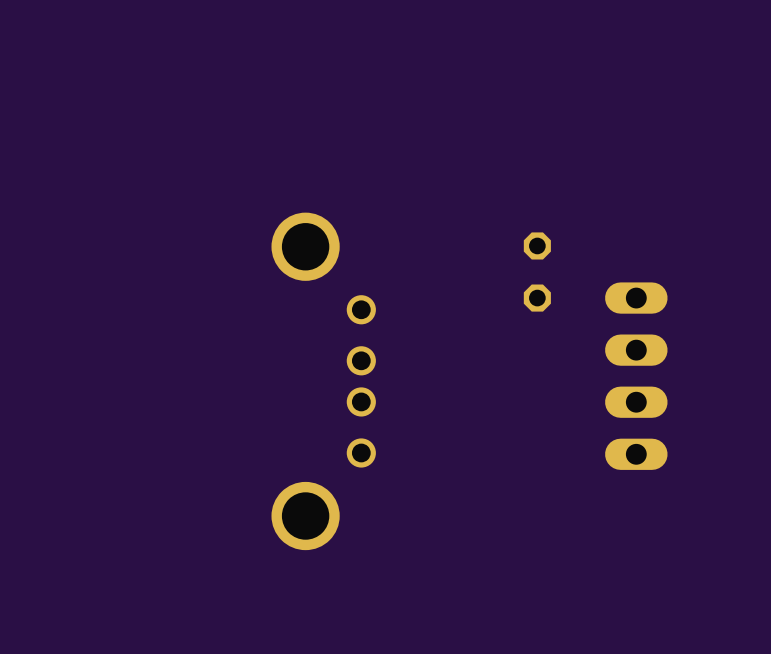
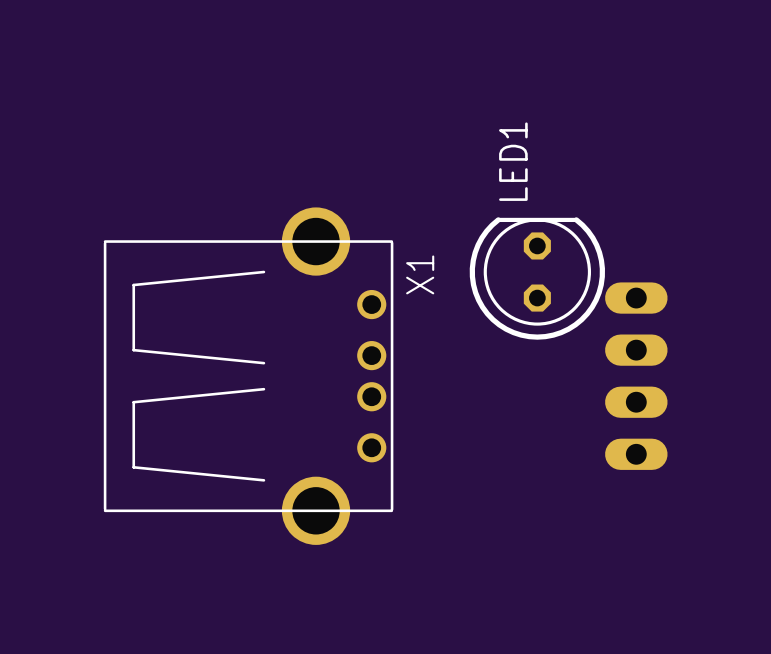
LED1 side: top (537, 272) -> bottom (537, 278)
X1 side: top (323, 381) -> bottom (248, 376)

